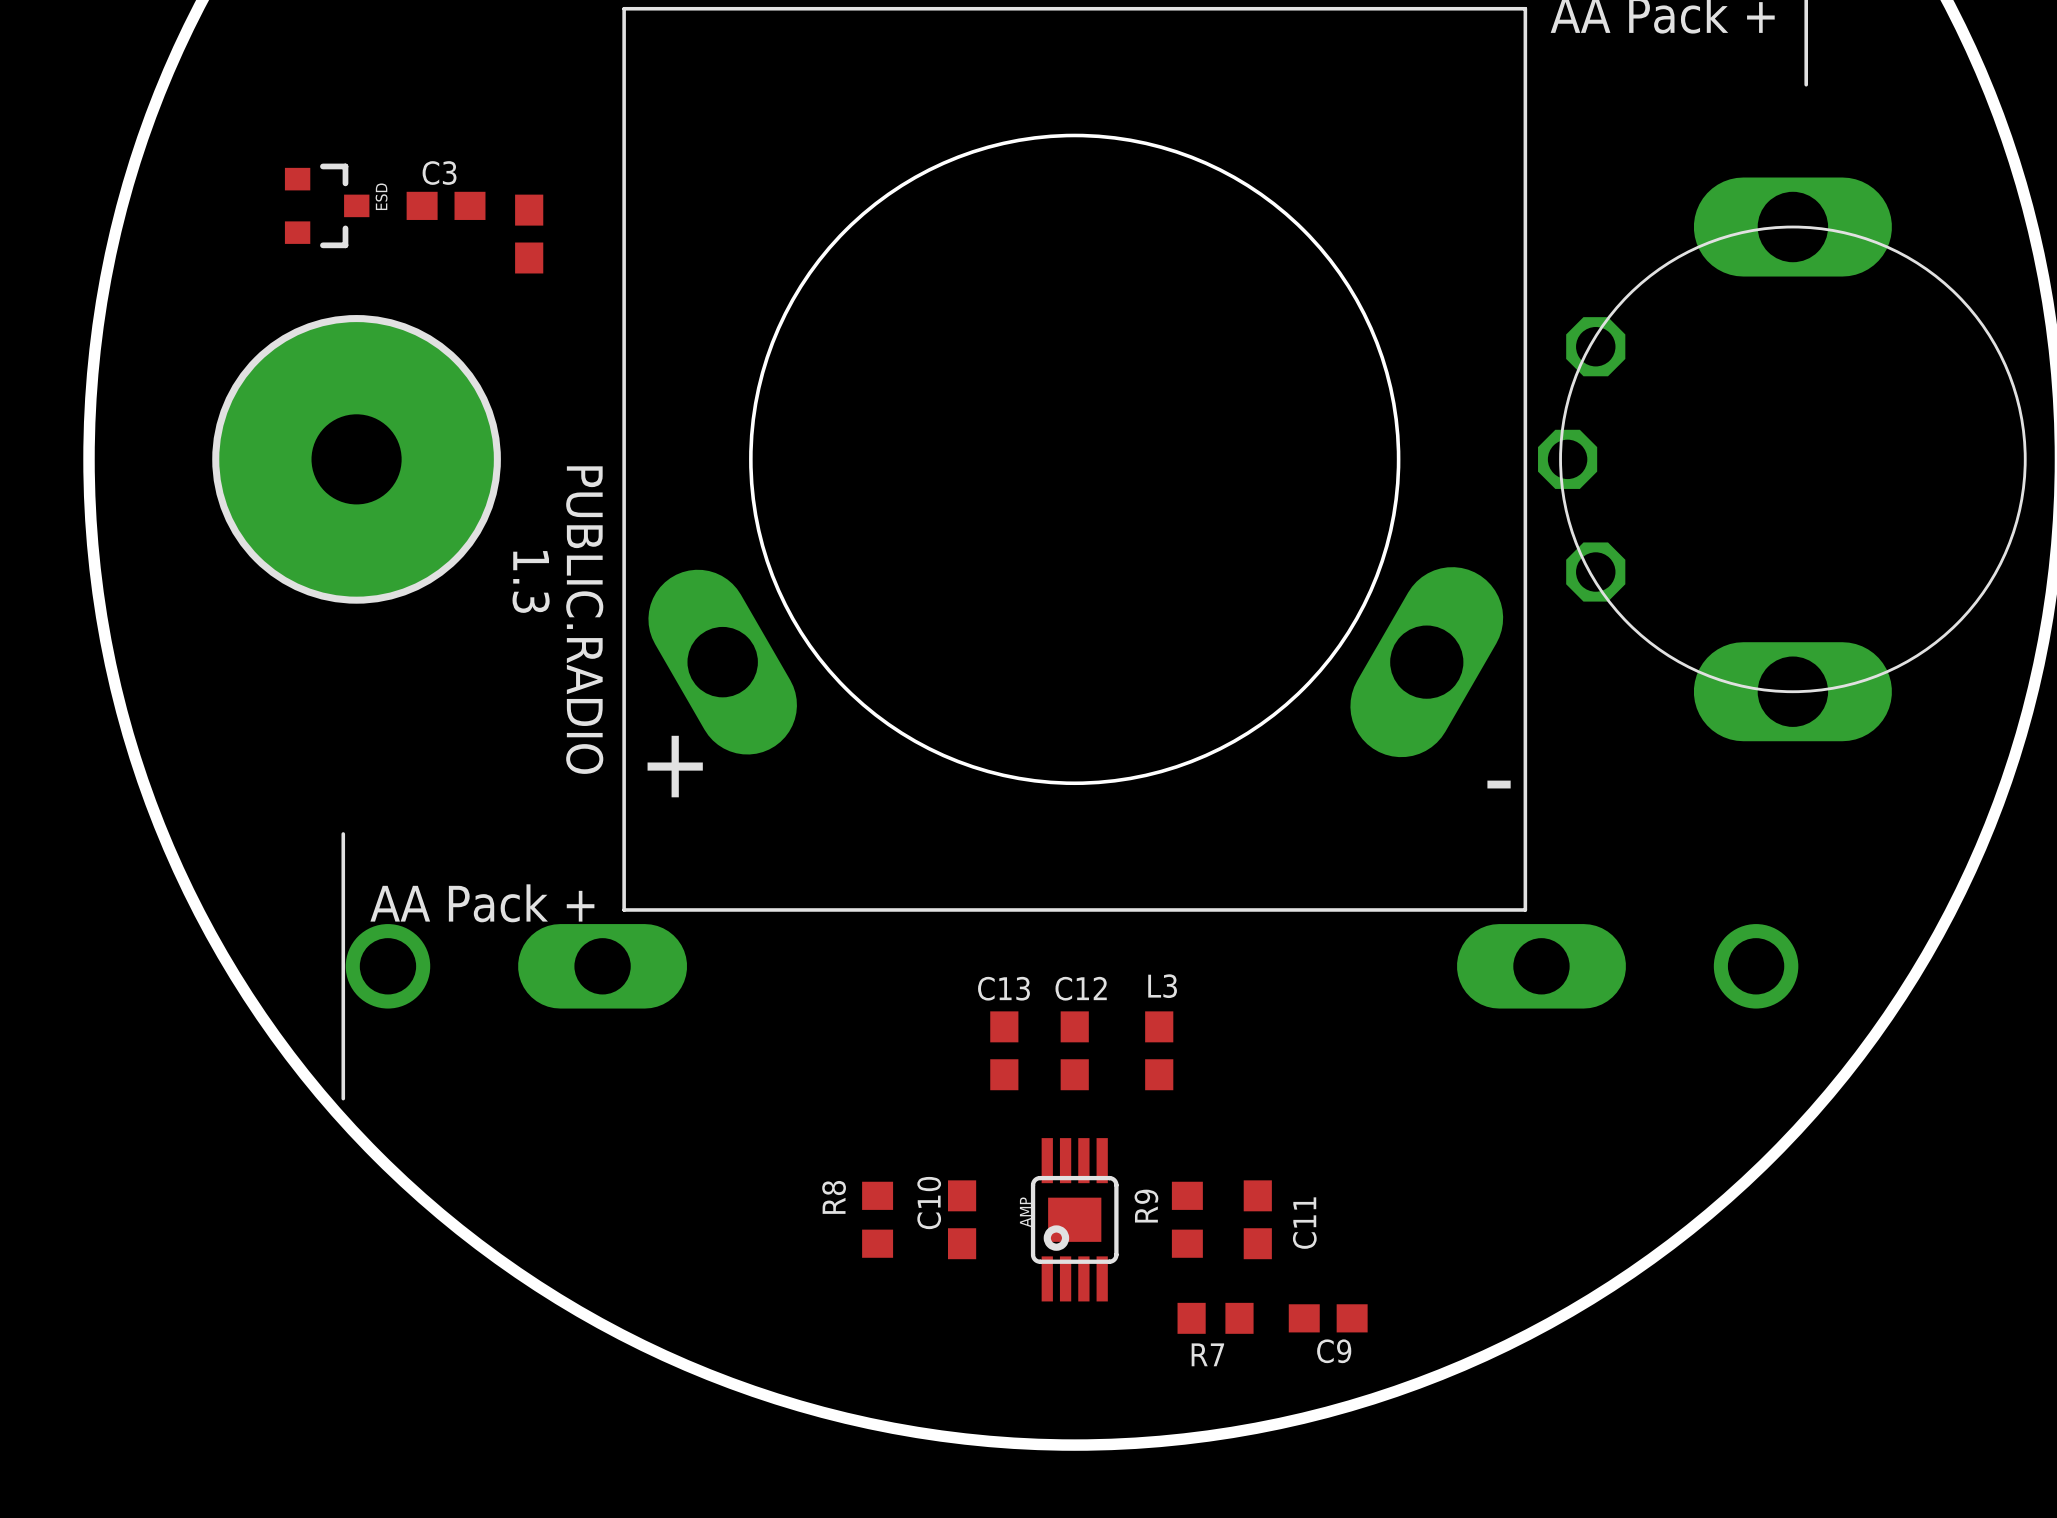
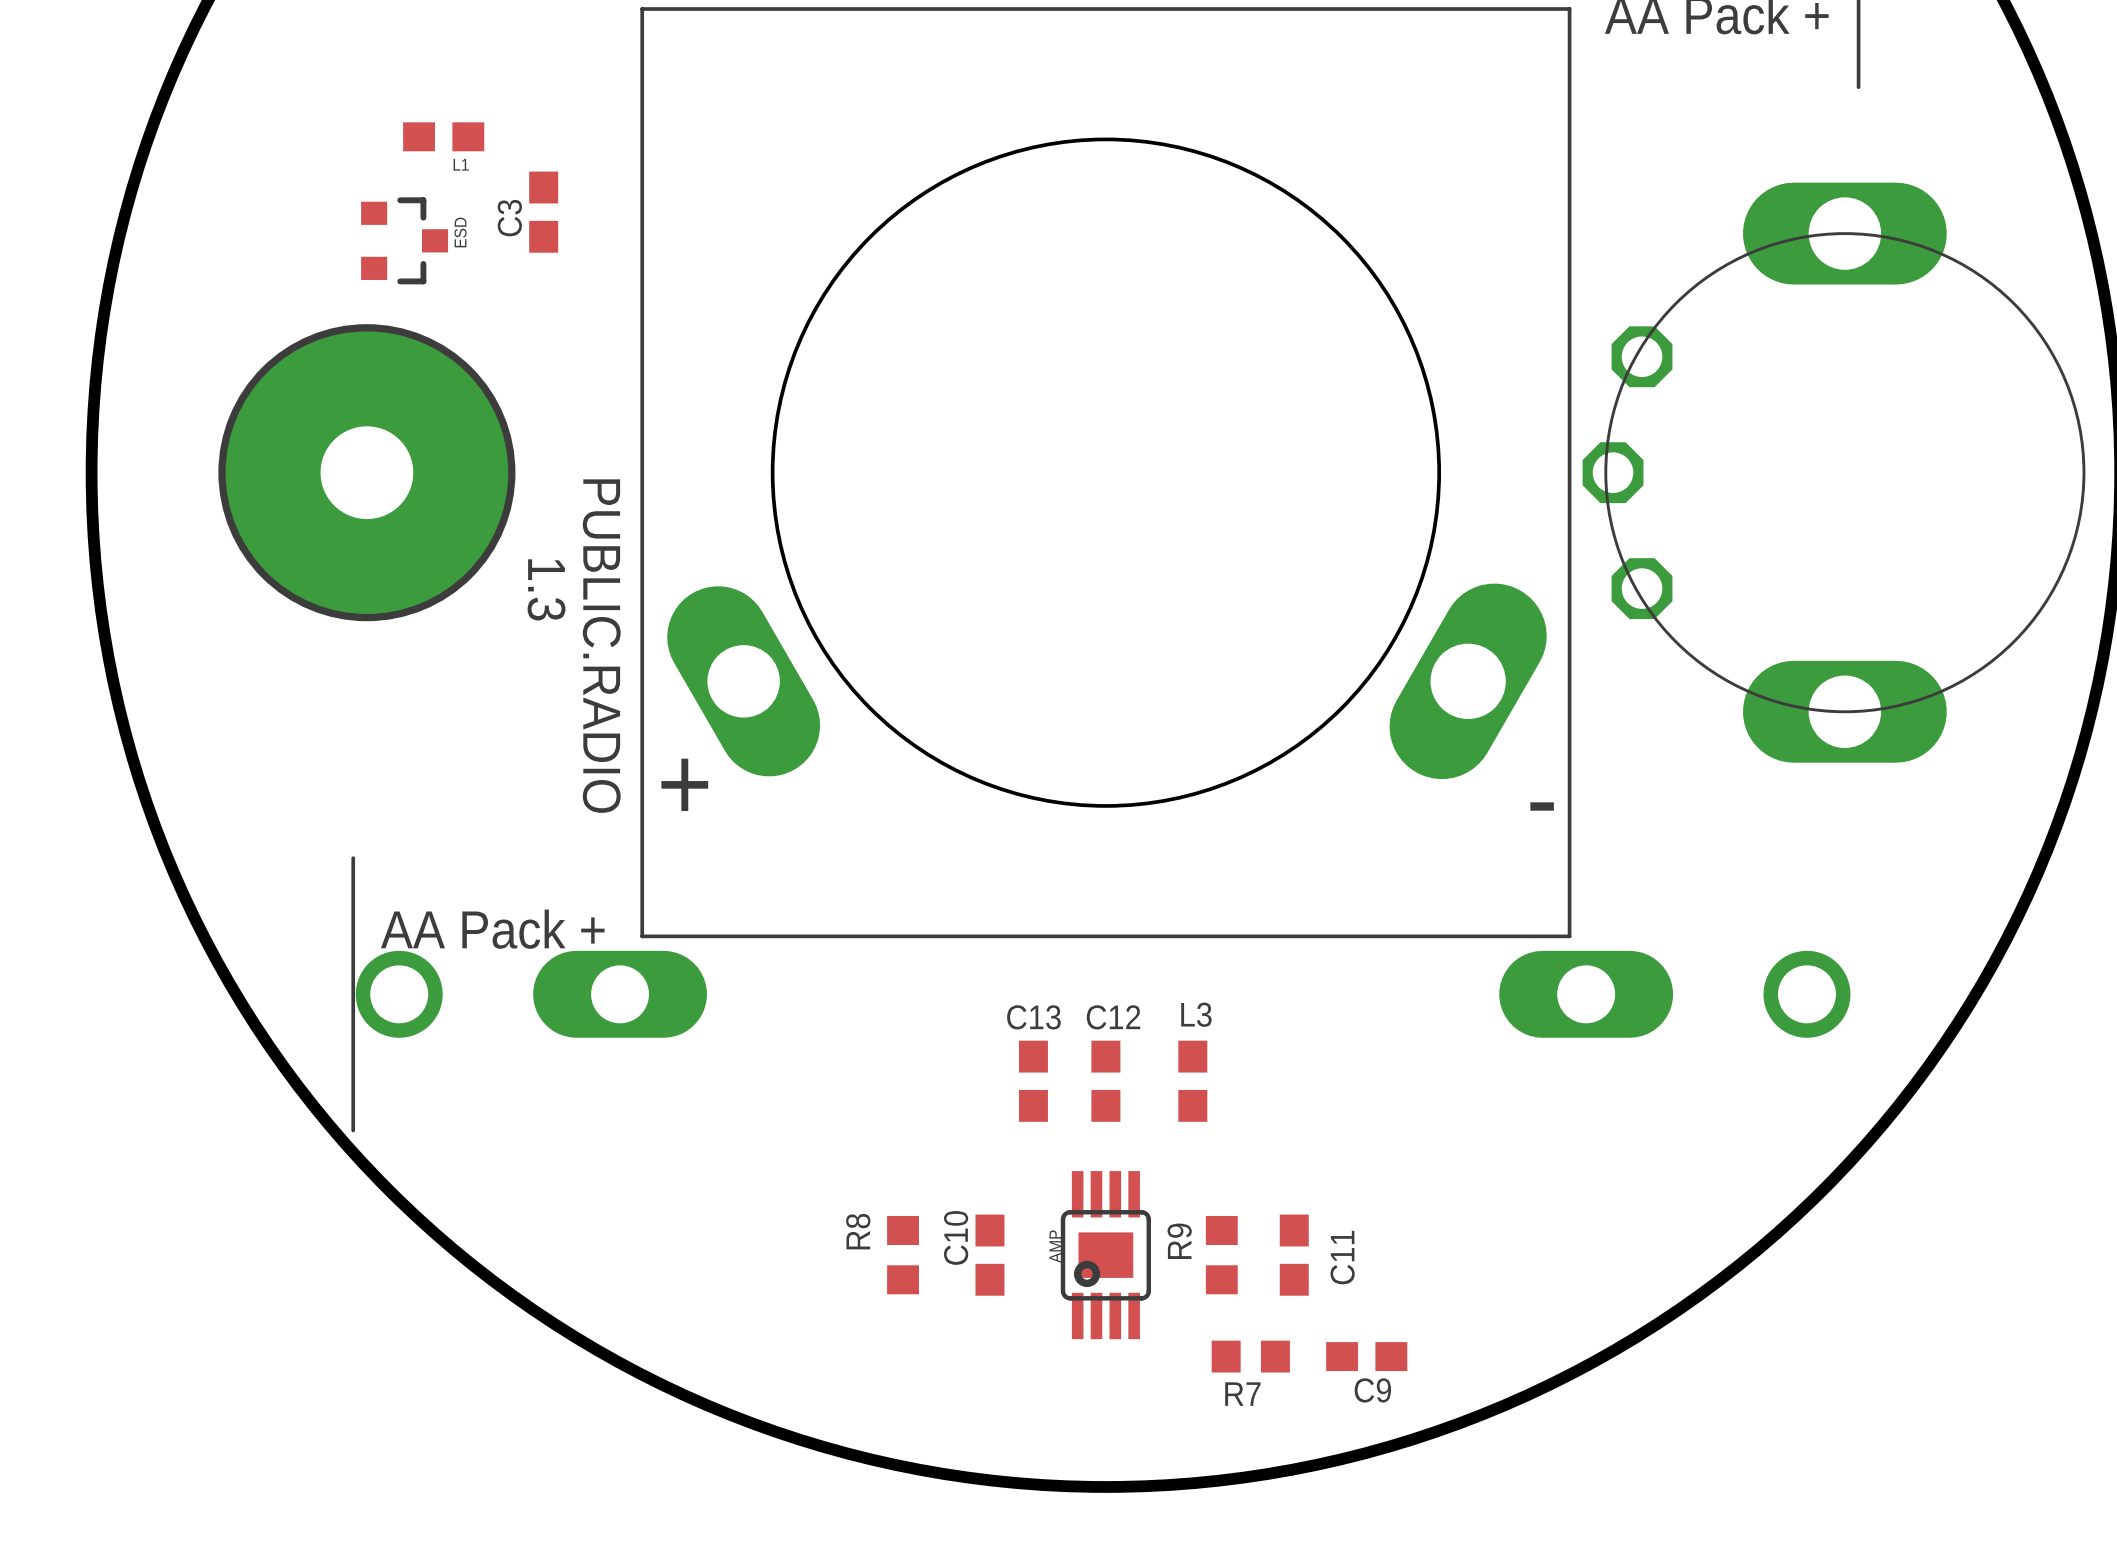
L1: none -> (443, 136)
ESD position: (327, 205) -> (404, 240)
C3 rotation: 0° (446, 205) -> 90° clockwise (543, 212)
C3 position: (446, 205) -> (543, 212)
part: (529, 234) -> none

